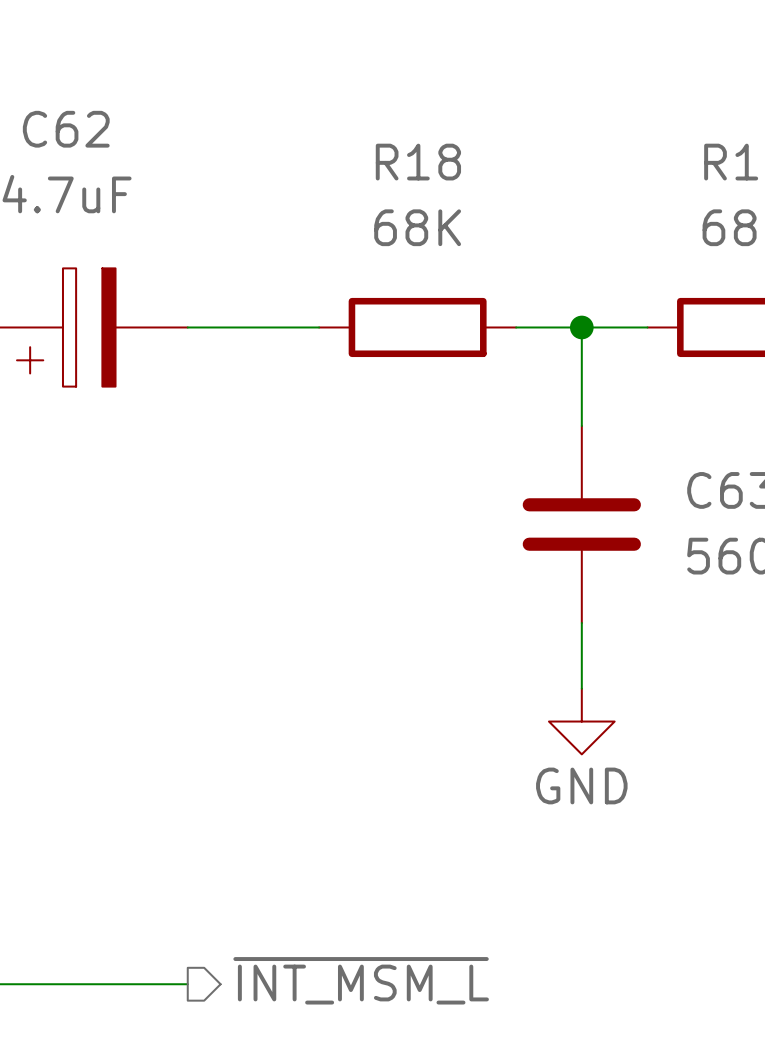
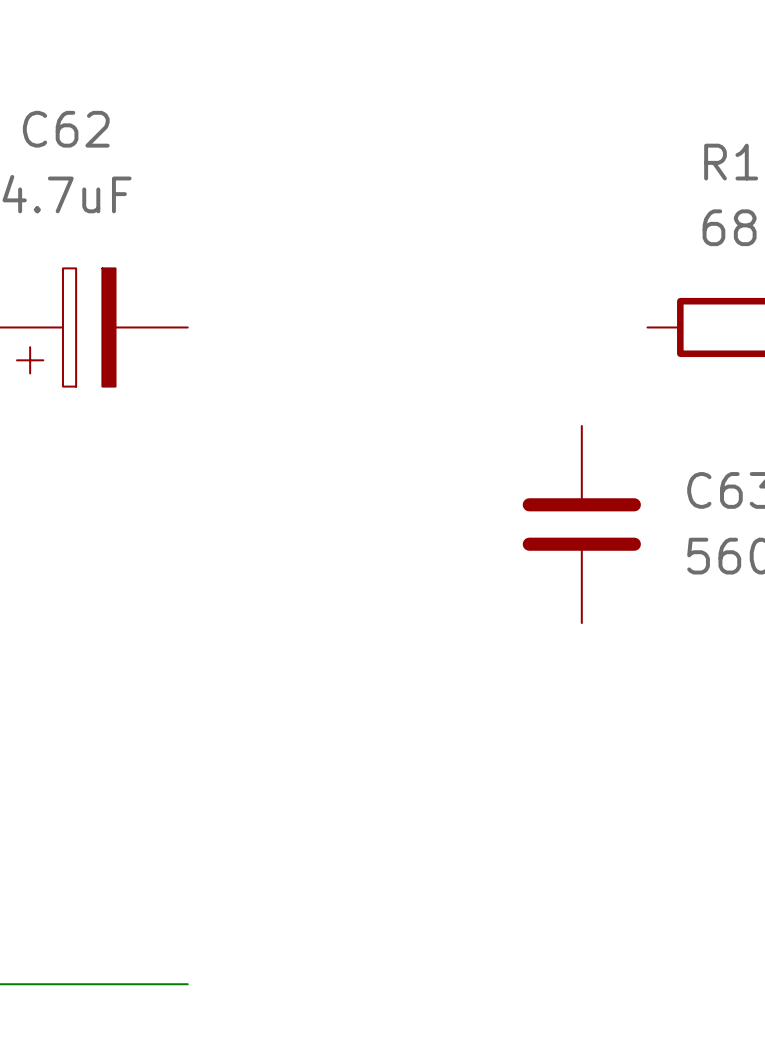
wire: (187, 327) (319, 327) -> none
R18: 68K (417, 327) -> none
wire: (516, 327) (647, 327) -> none
wire: (581, 327) (581, 425) -> none
junction: (581, 327) -> none
wire: (581, 623) (581, 688) -> none
power symbol: GND (581, 721) -> none
hierarchical label: ~{INT_MSM_L} (361, 980) -> none

